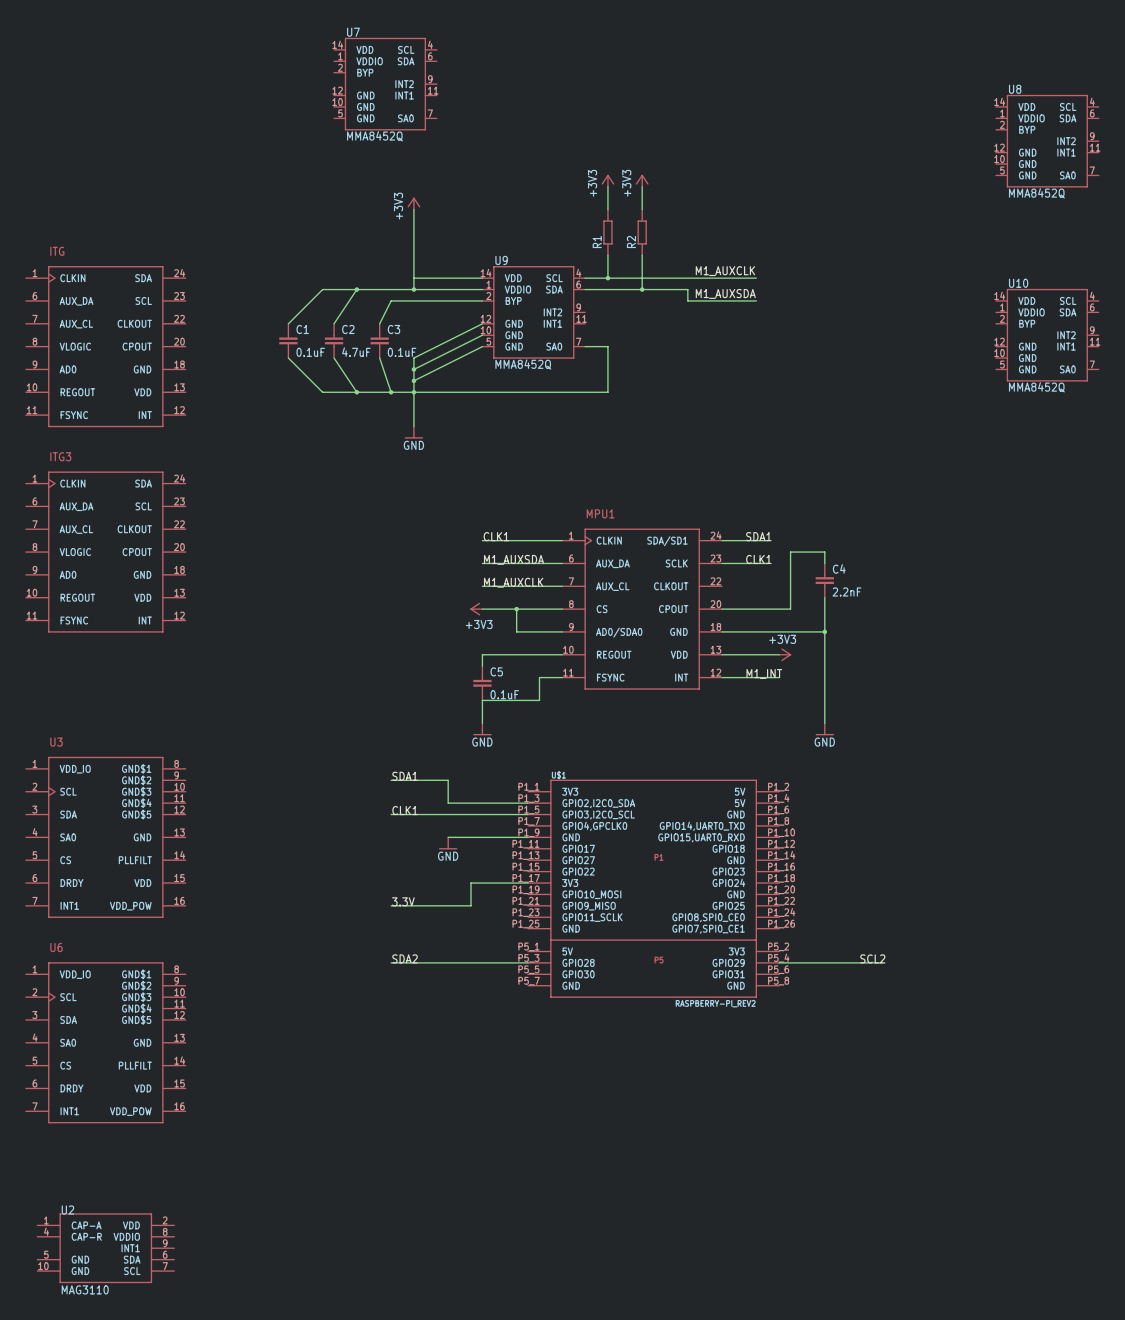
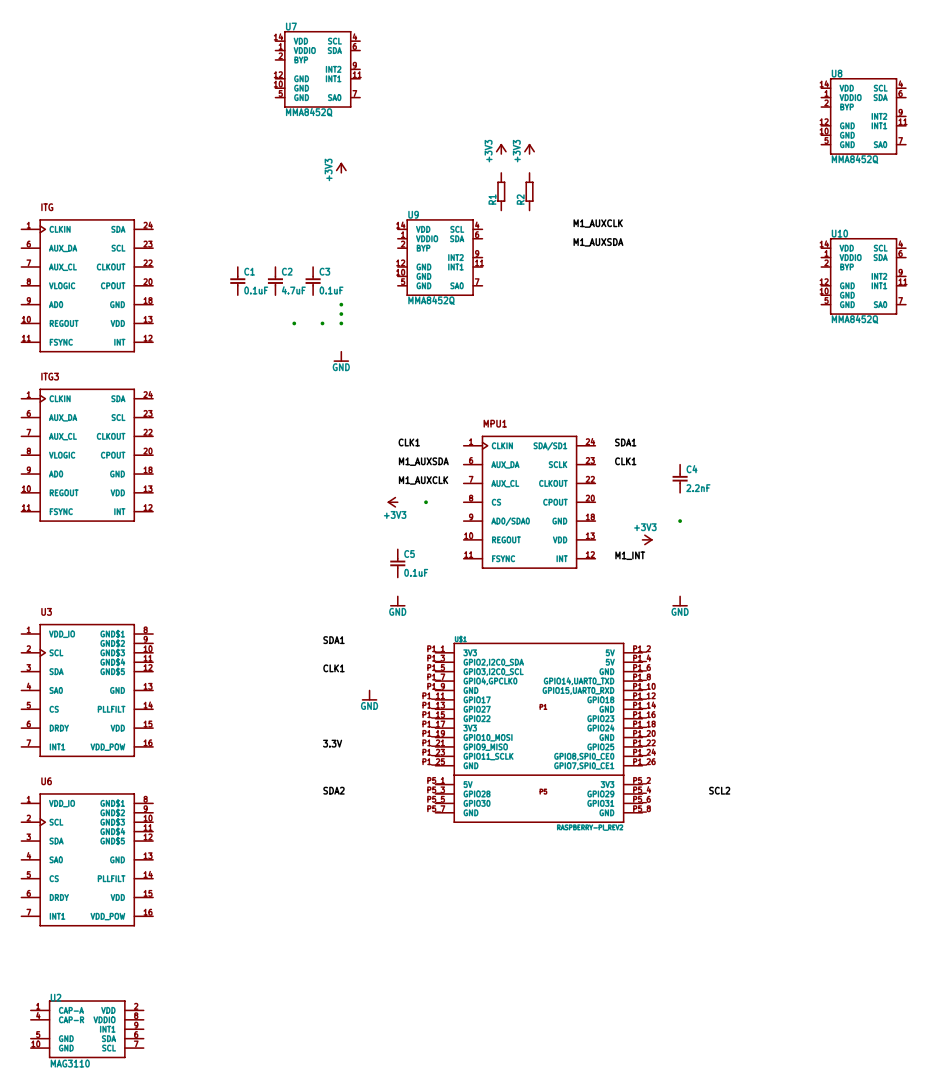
wire: (607, 186) (607, 209) -> none
wire: (642, 186) (642, 209) -> none
wire: (413, 209) (413, 289) -> none
wire: (607, 255) (607, 278) -> none
wire: (642, 255) (642, 289) -> none
wire: (413, 278) (482, 278) -> none
wire: (585, 278) (756, 278) -> none
junction: (607, 278) -> none
wire: (356, 289) (334, 323) -> none
junction: (356, 289) -> none
junction: (413, 289) -> none
wire: (482, 289) (322, 289) (288, 323) -> none
wire: (585, 289) (687, 289) (687, 300) (756, 300) -> none
junction: (642, 289) -> none
wire: (482, 300) (391, 300) (379, 323) -> none
wire: (482, 323) (413, 358) (413, 426) -> none
wire: (482, 335) (413, 369) -> none
wire: (482, 346) (413, 380) -> none
wire: (585, 346) (607, 346) (607, 392) (322, 392) (288, 358) -> none
wire: (334, 358) (356, 392) -> none
wire: (379, 358) (391, 392) -> none
wire: (482, 540) (562, 540) -> none
wire: (722, 540) (767, 540) -> none
wire: (482, 563) (562, 563) -> none
wire: (722, 563) (767, 563) -> none
wire: (824, 563) (824, 552) (790, 552) (790, 609) (722, 609) -> none
wire: (482, 586) (562, 586) -> none
wire: (824, 597) (824, 723) -> none
wire: (482, 609) (562, 609) -> none
wire: (516, 609) (516, 631) (562, 631) -> none
wire: (722, 631) (824, 631) -> none
wire: (562, 654) (482, 654) (482, 666) -> none
wire: (722, 654) (779, 654) -> none
wire: (562, 677) (539, 677) (539, 700) (482, 700) (482, 723) -> none
wire: (722, 677) (779, 677) -> none
wire: (391, 780) (448, 780) (448, 803) (528, 803) -> none
wire: (391, 814) (528, 814) -> none
wire: (448, 837) (528, 837) -> none
wire: (528, 883) (471, 883) (471, 905) (391, 905) -> none
wire: (391, 962) (528, 962) -> none
wire: (779, 962) (881, 962) -> none

